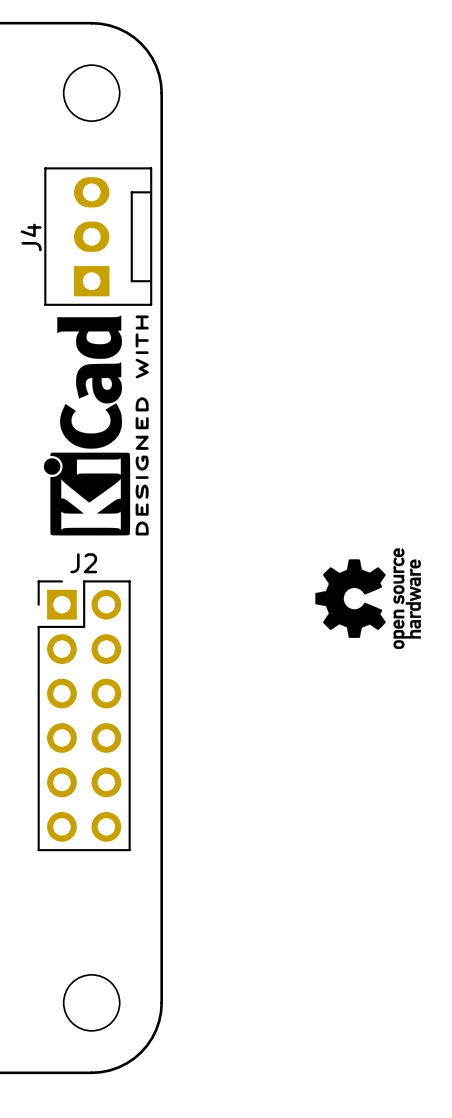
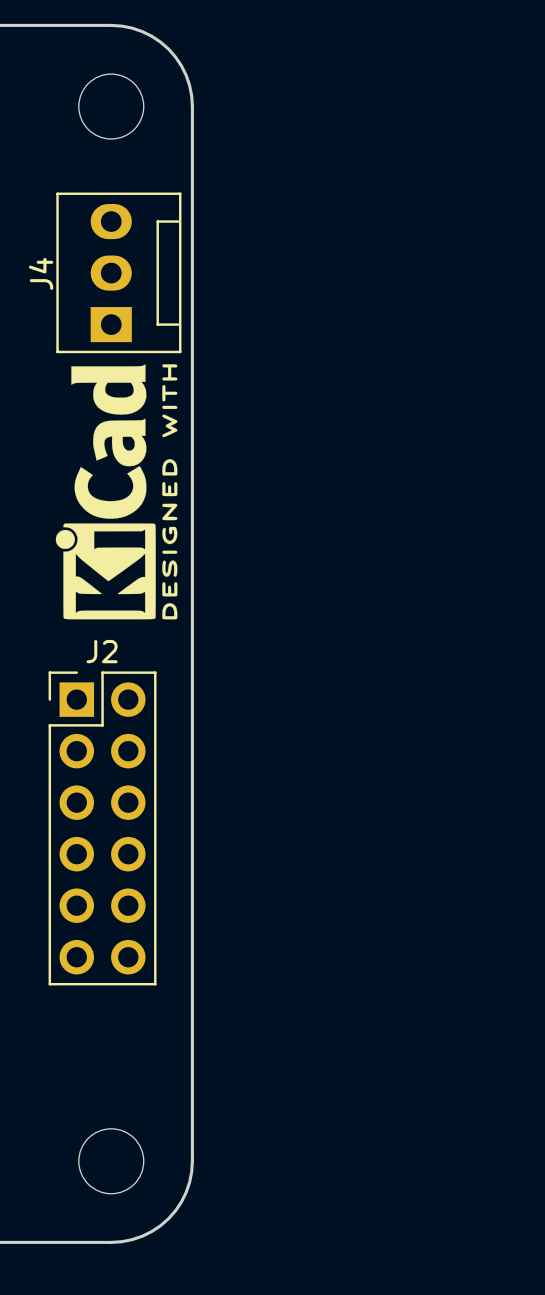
drawing: [315, 548, 422, 649] -> none

